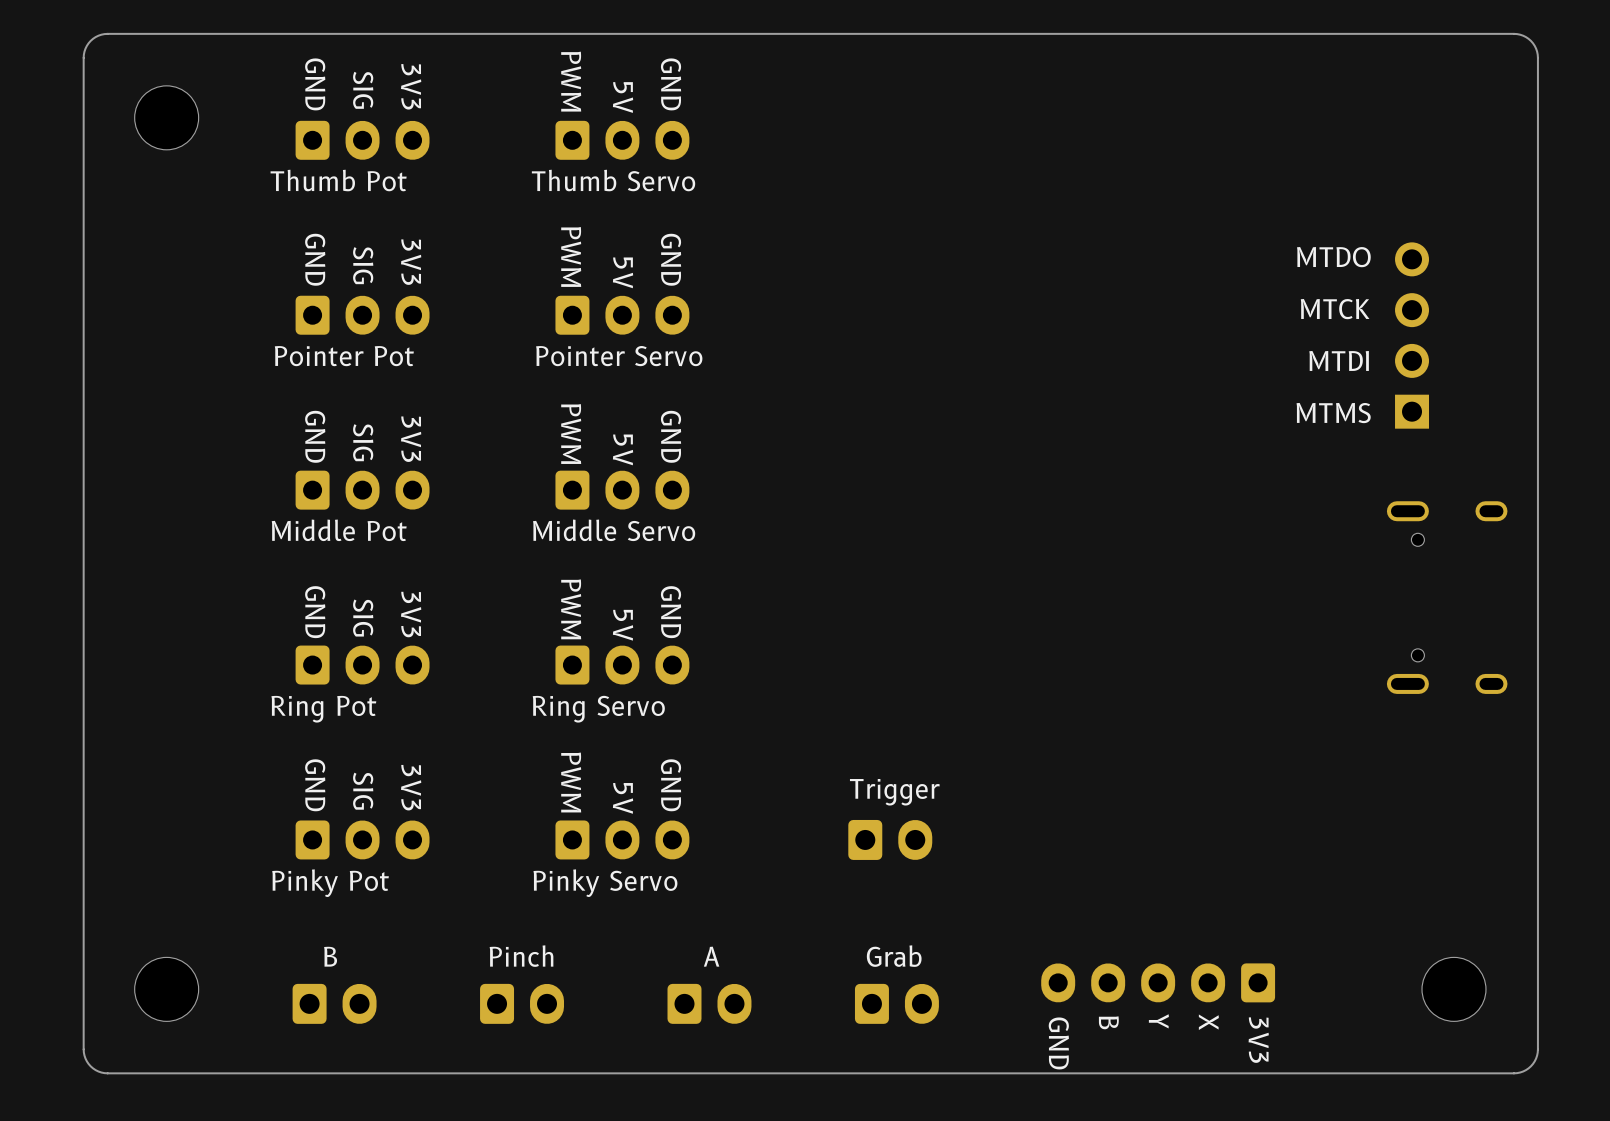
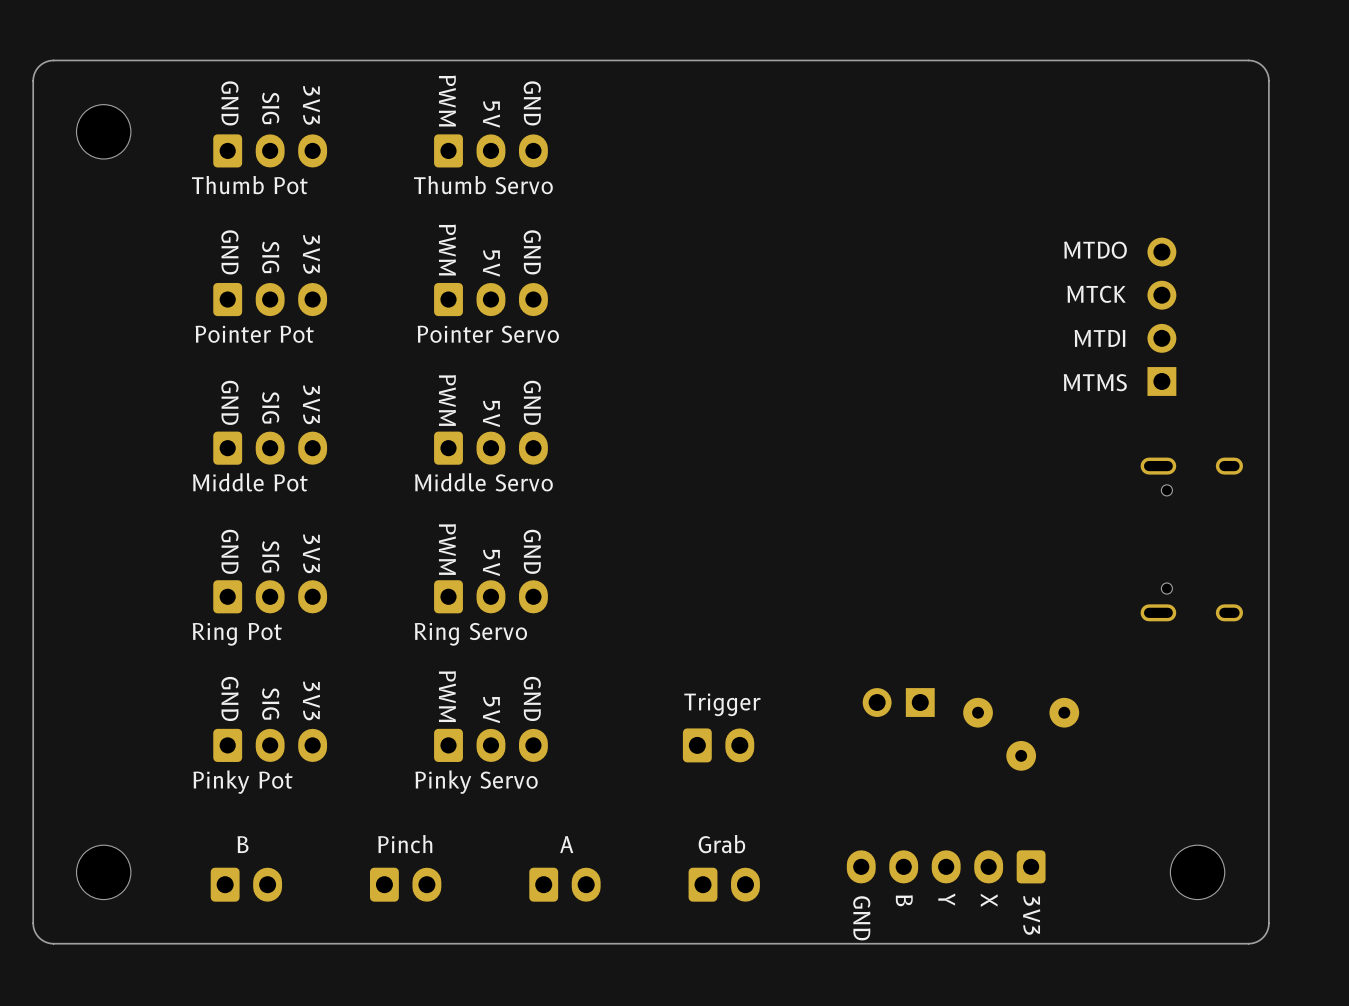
part: none -> (898, 702)
part: none -> (1021, 734)

